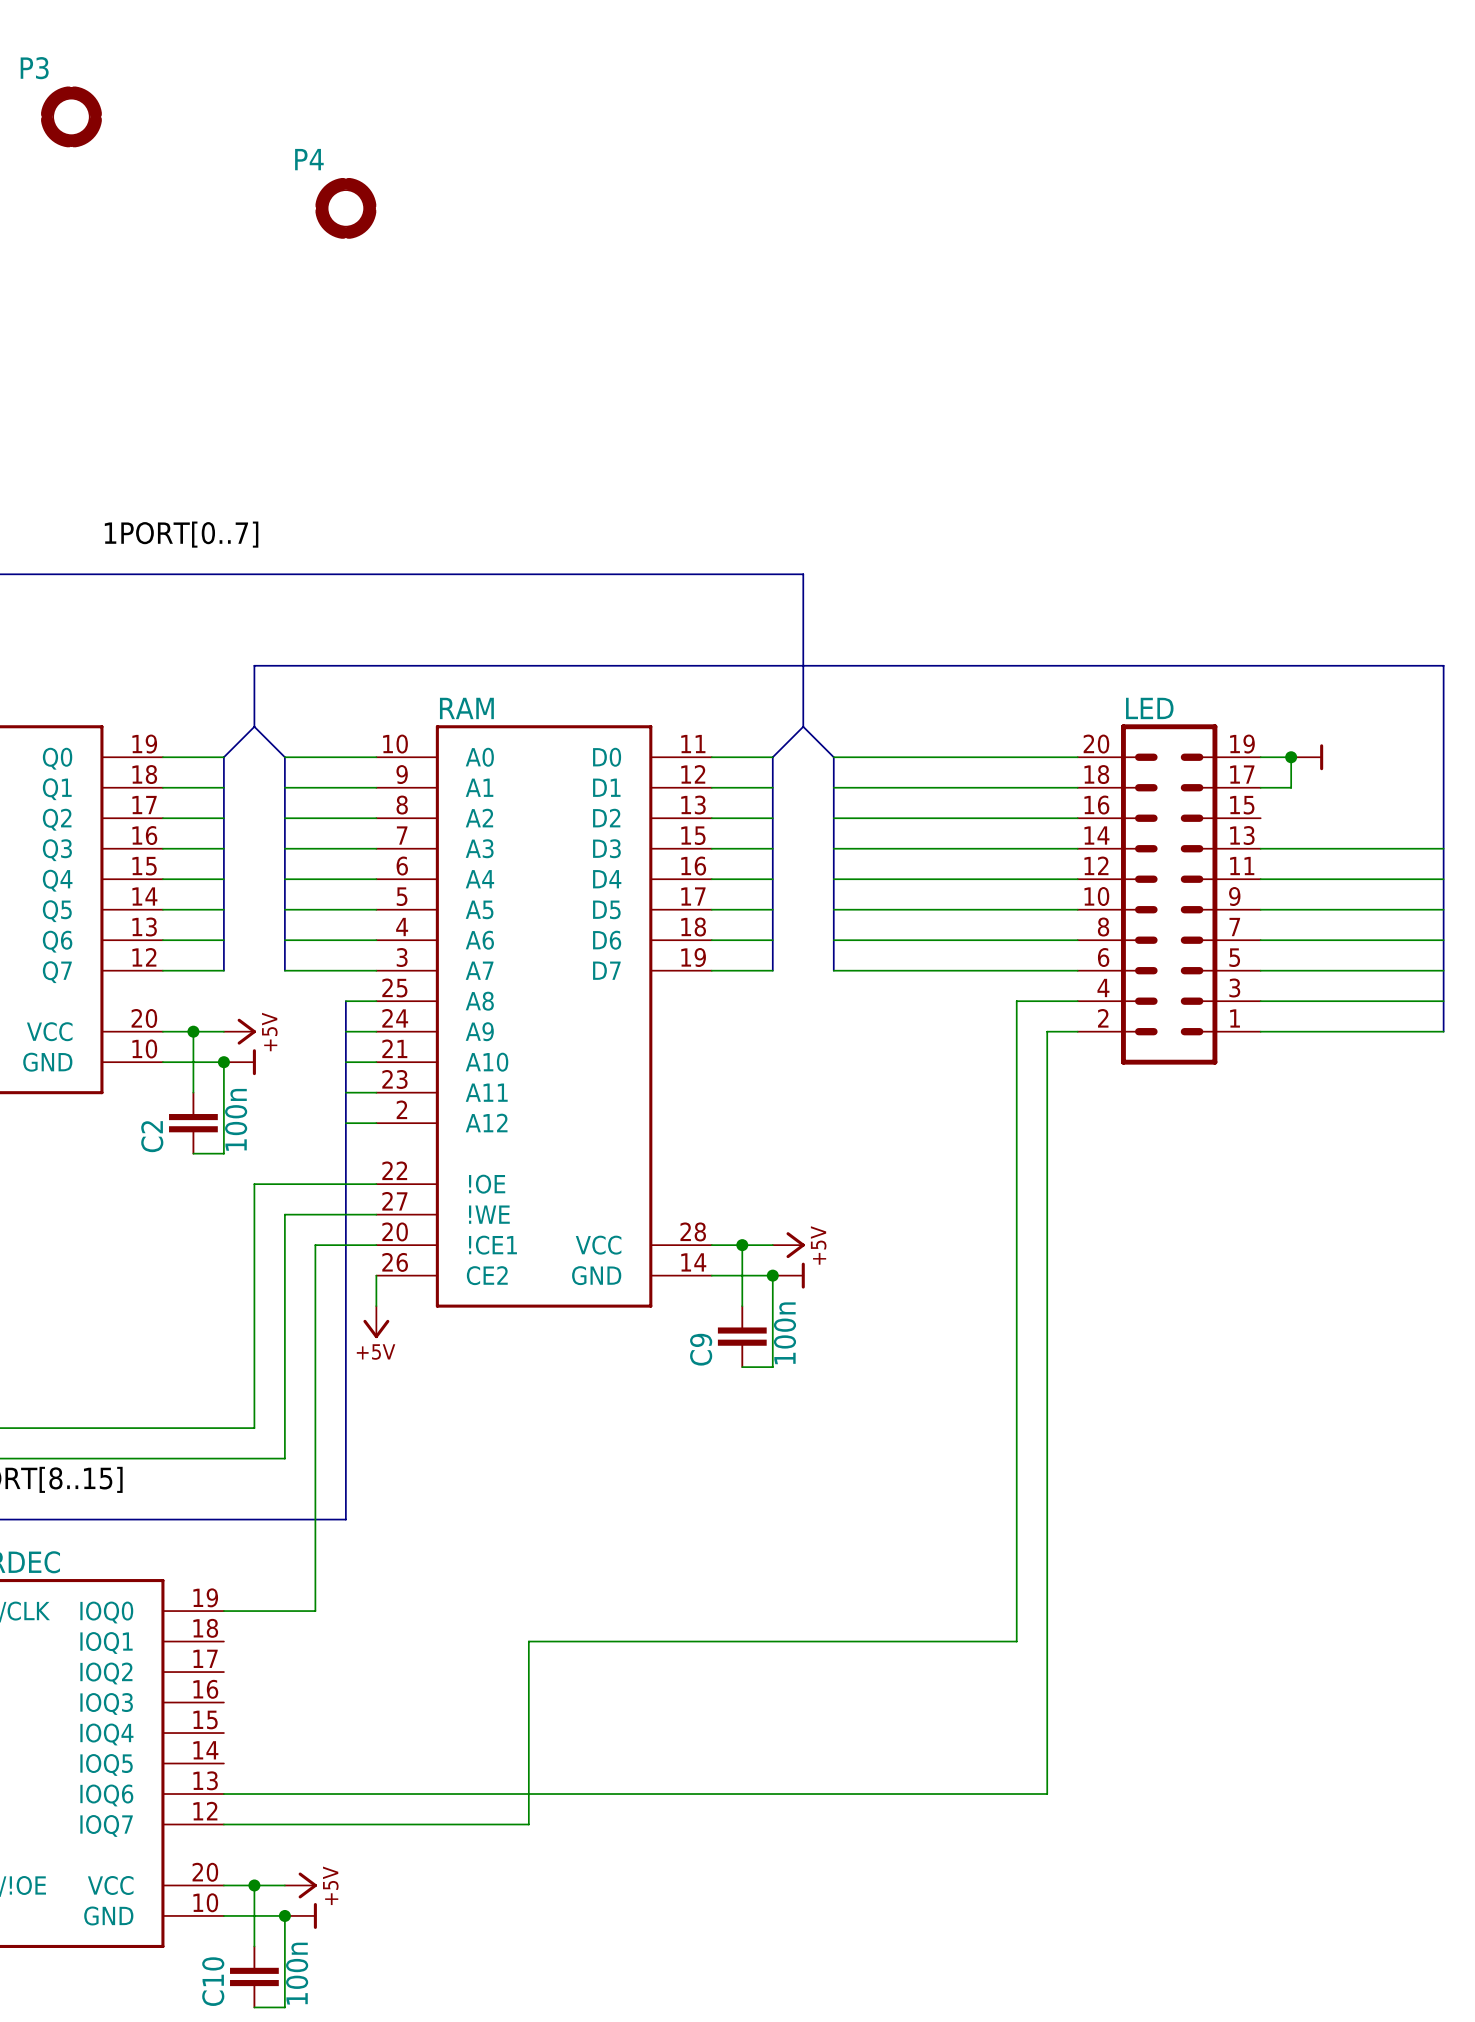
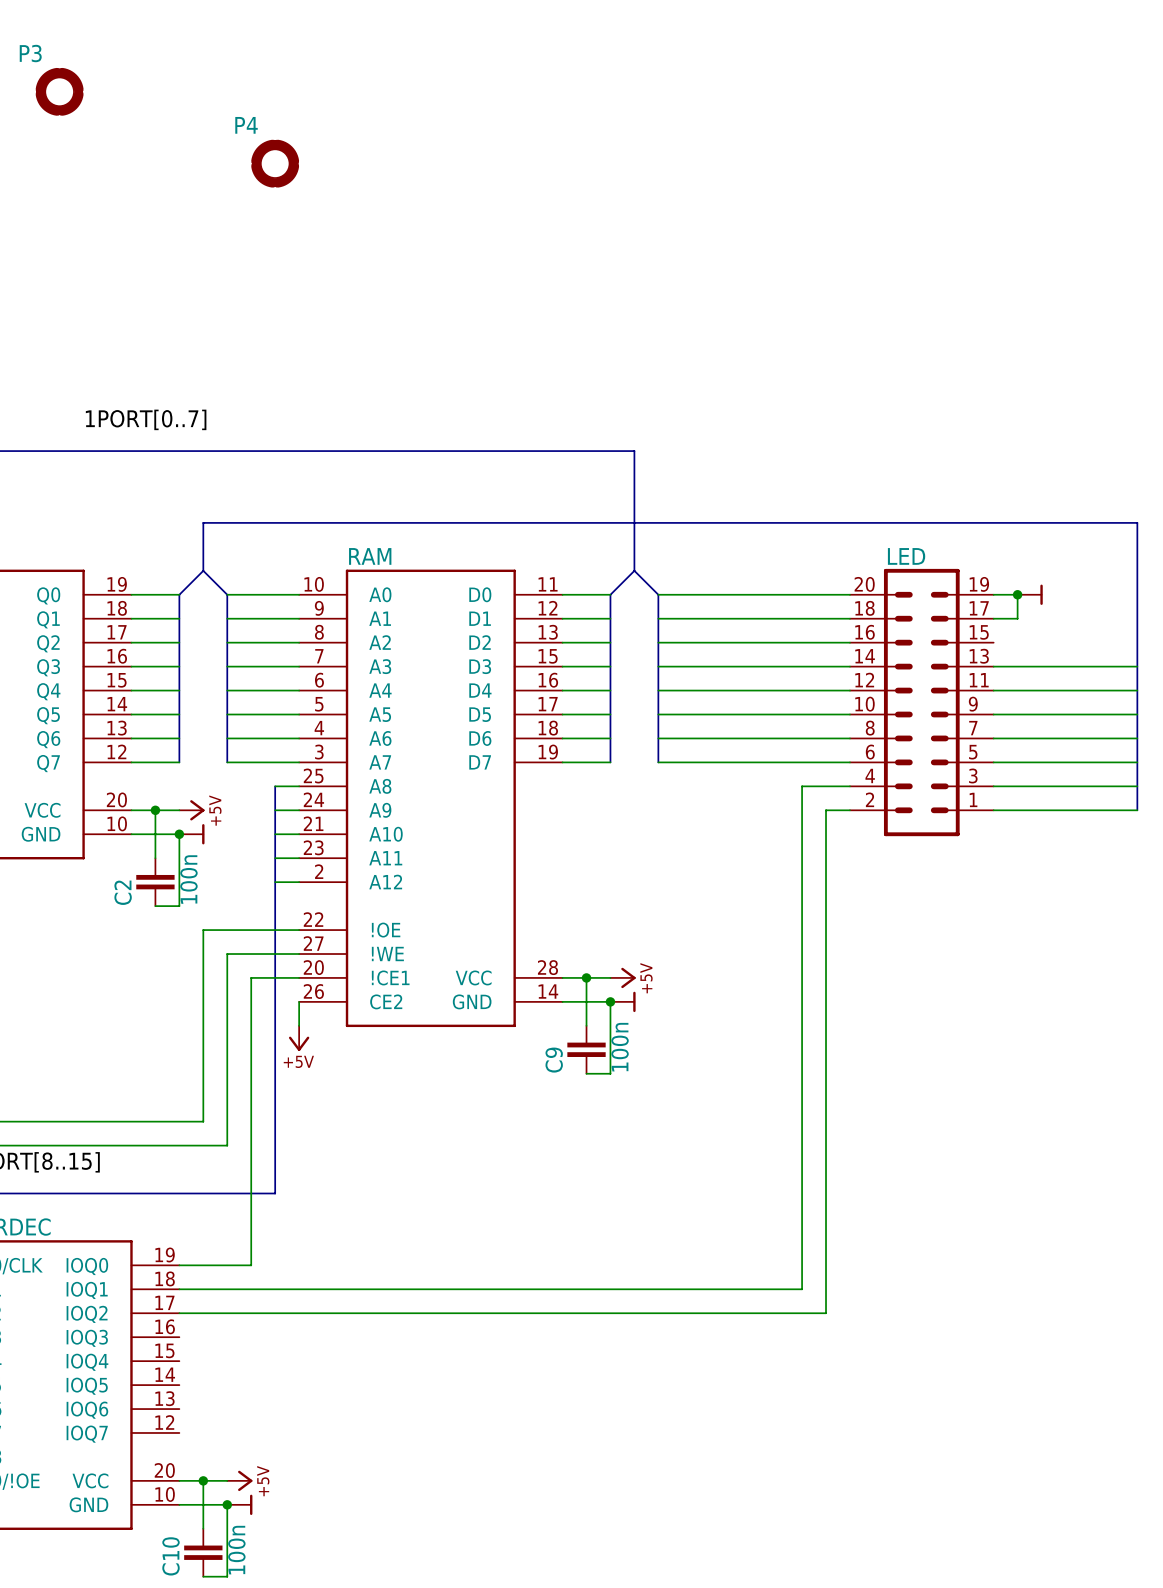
wire: (528, 1641) (528, 1824) (223, 1824) -> (418, 1289) (179, 1289)
wire: (1047, 1672) (1047, 1794) (223, 1794) -> (826, 1313) (179, 1313)

